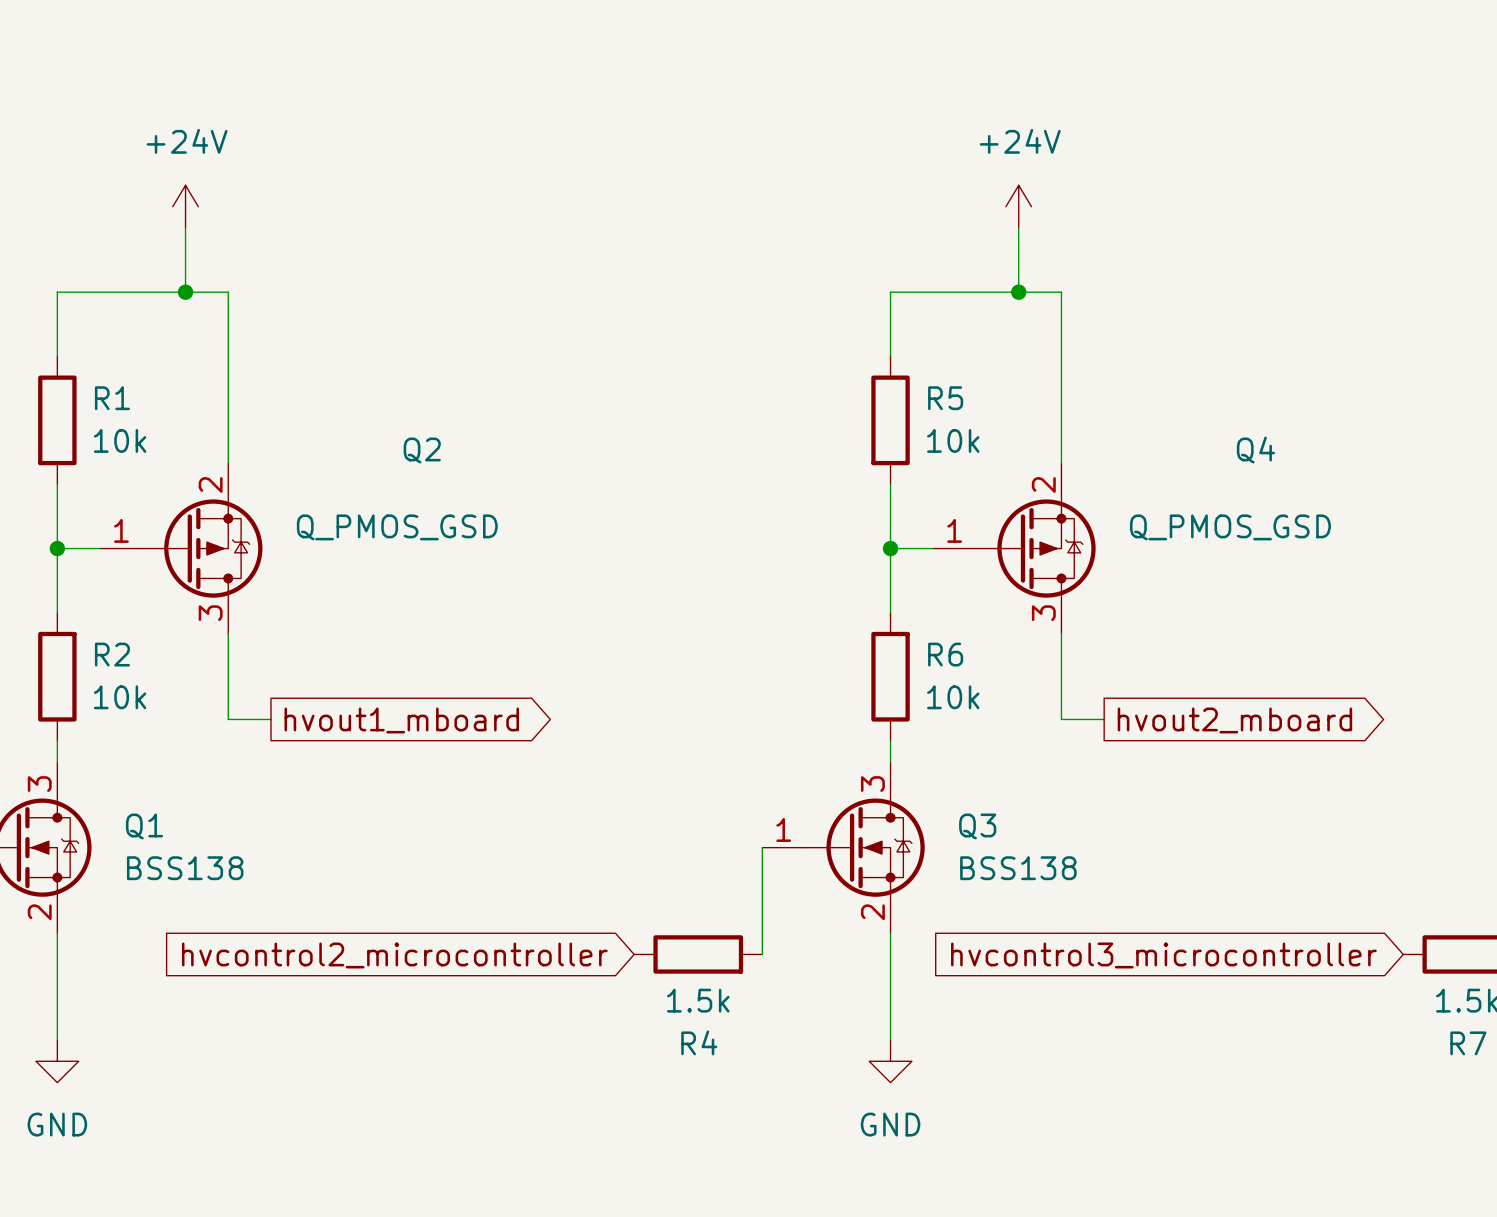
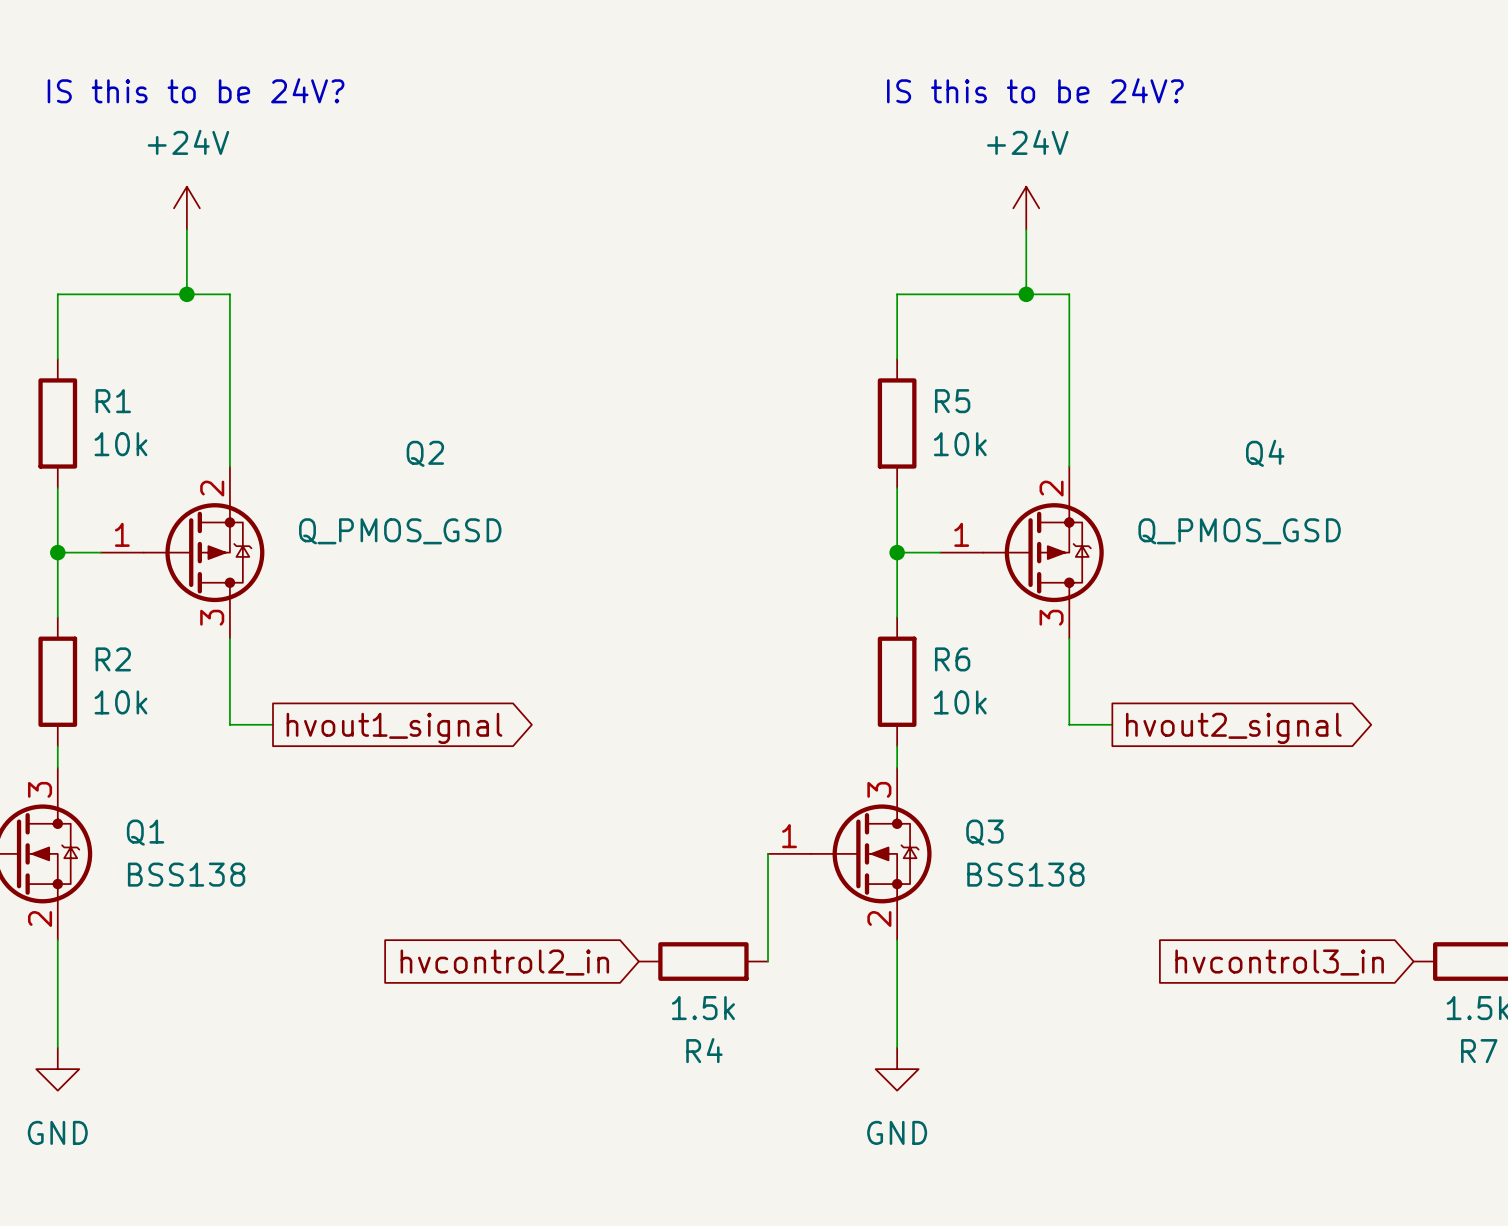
text: none -> IS this to be 24V? (196, 90)
text: none -> IS this to be 24V? (1035, 90)
global label: hvout1_mboard (401, 720) -> hvout1_signal (394, 728)
global label: hvout2_mboard (1234, 720) -> hvout2_signal (1233, 728)
global label: hvcontrol2_microcontroller (394, 955) -> hvcontrol2_in (504, 962)
global label: hvcontrol3_microcontroller (1163, 955) -> hvcontrol3_in (1279, 962)

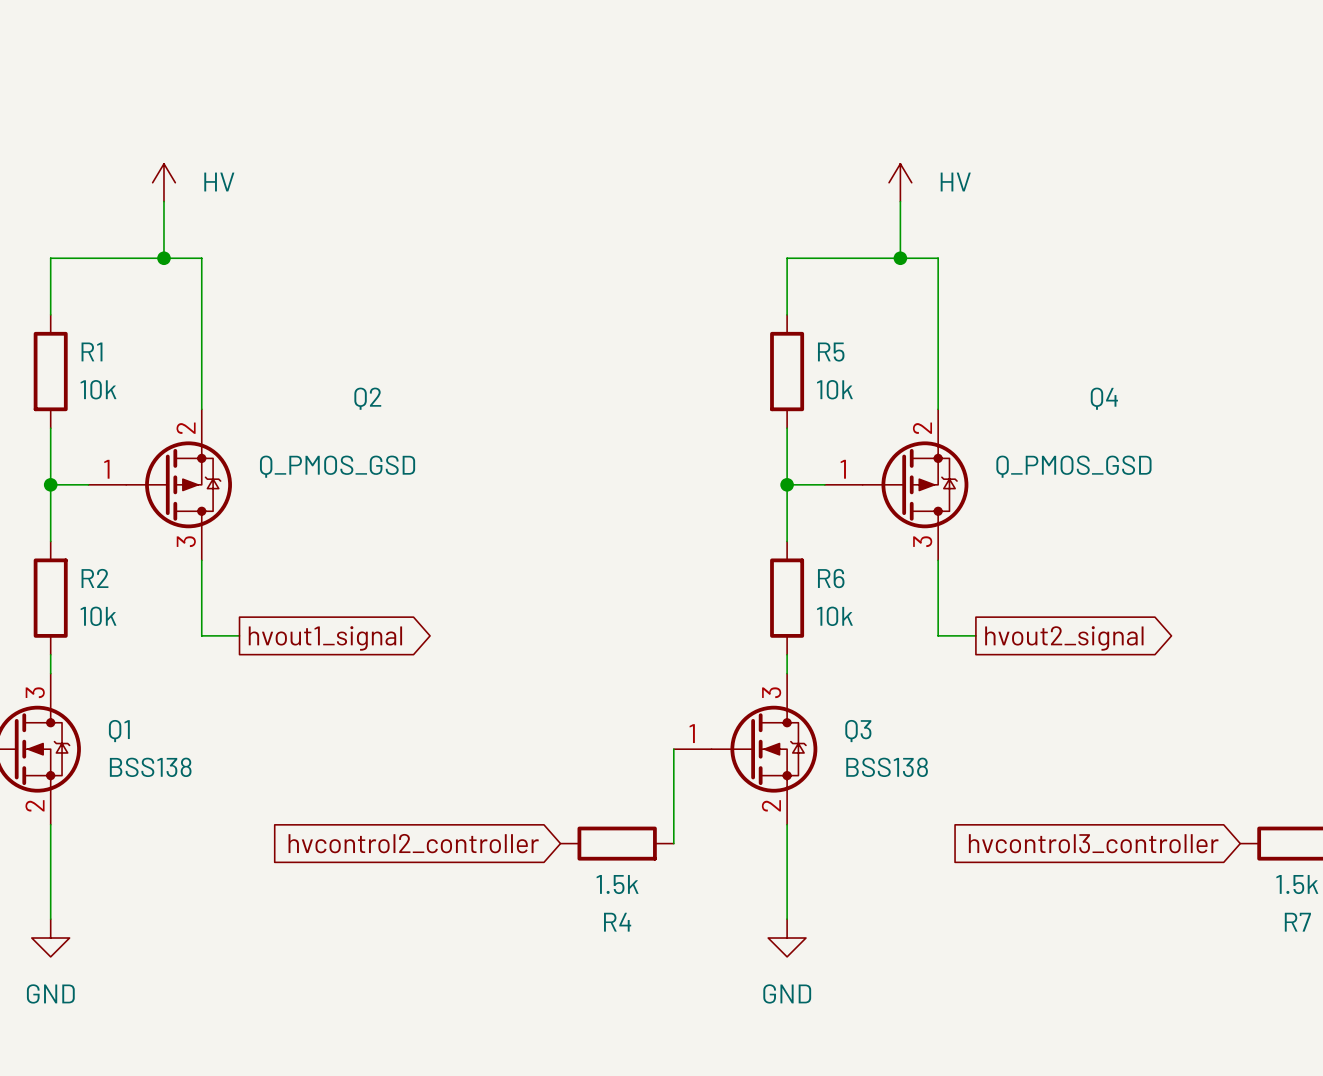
text: IS this to be 24V? (196, 90) -> none
text: IS this to be 24V? (1035, 90) -> none
power symbol: +24V (186, 208) -> HV (163, 182)
power symbol: +24V (1026, 208) -> HV (900, 182)
global label: hvcontrol2_in (504, 962) -> hvcontrol2_controller (413, 843)
global label: hvcontrol3_in (1279, 962) -> hvcontrol3_controller (1093, 843)

